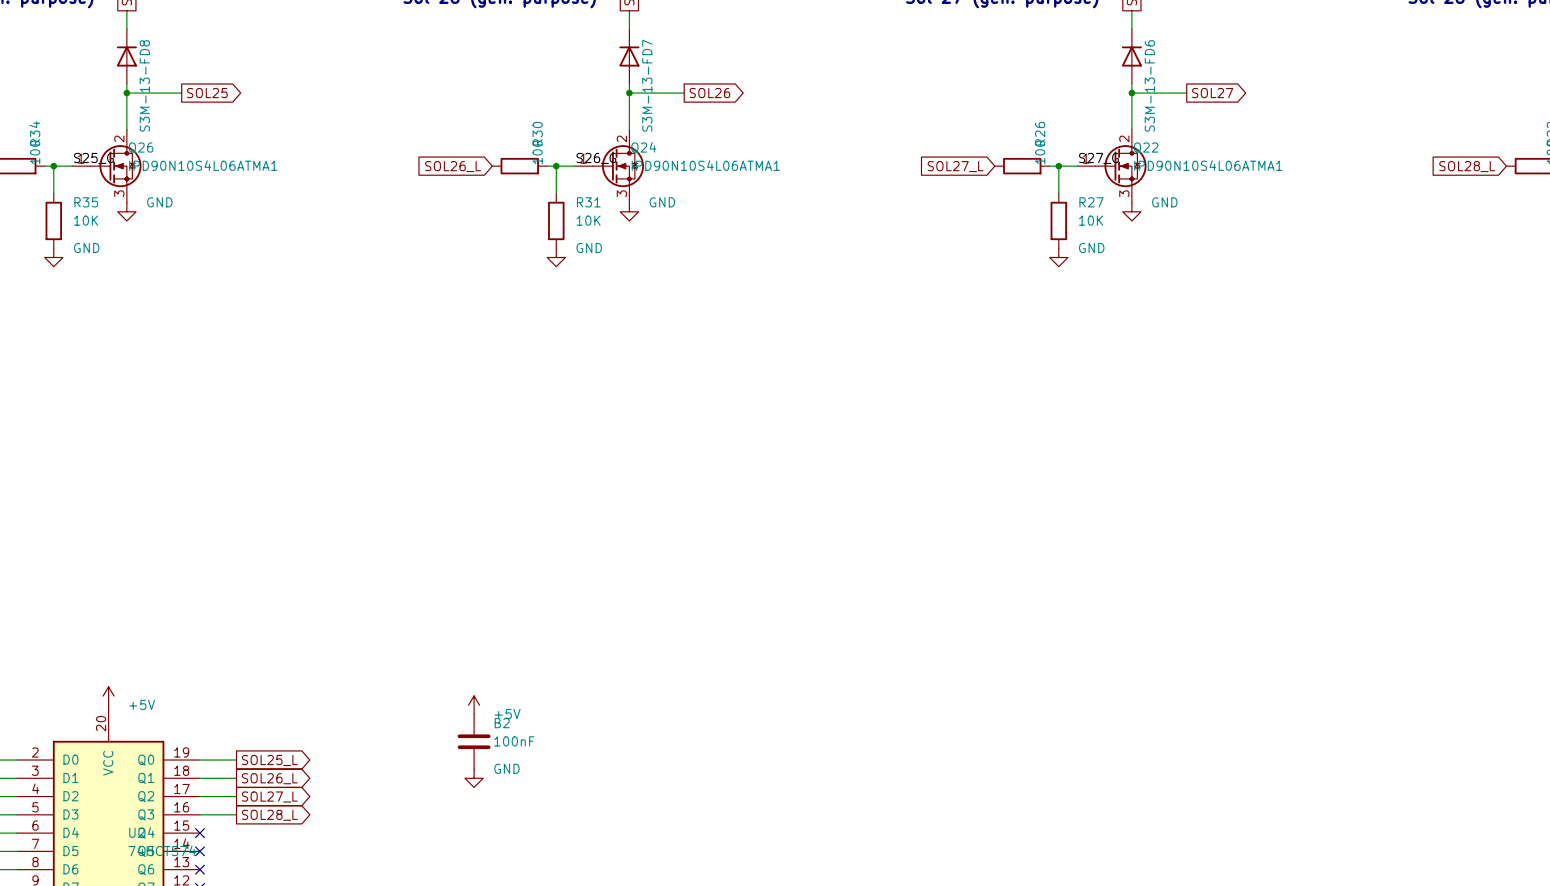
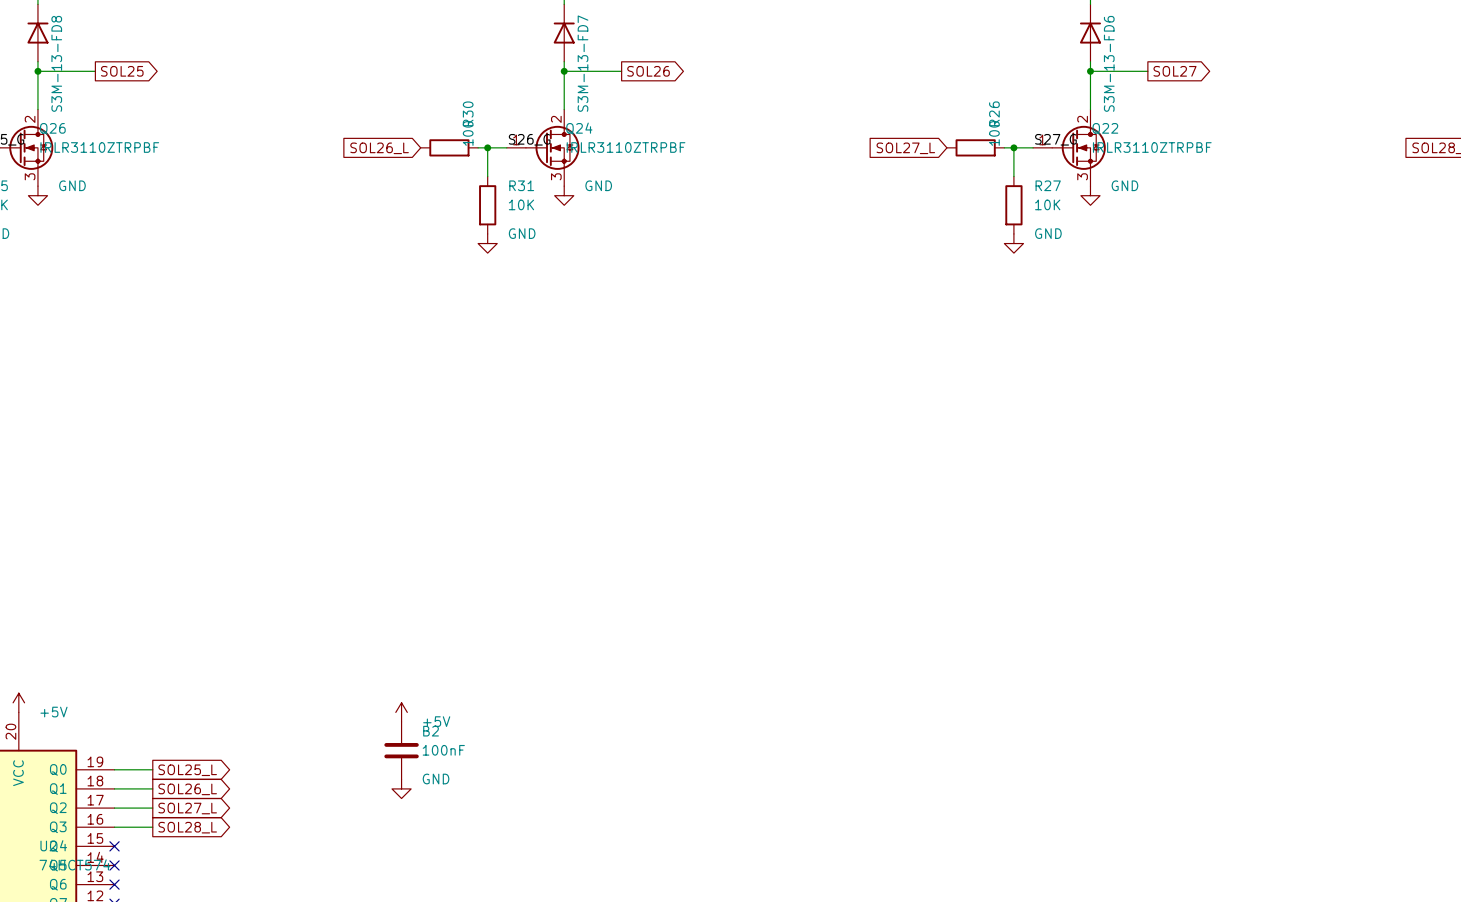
Q26 value: IPD90N10S4L06ATMA1 (203, 165) -> IRLR3110ZTRPBF (99, 147)
Q24 value: IPD90N10S4L06ATMA1 (705, 165) -> IRLR3110ZTRPBF (626, 147)
Q22 value: IPD90N10S4L06ATMA1 (1208, 165) -> IRLR3110ZTRPBF (1152, 147)

